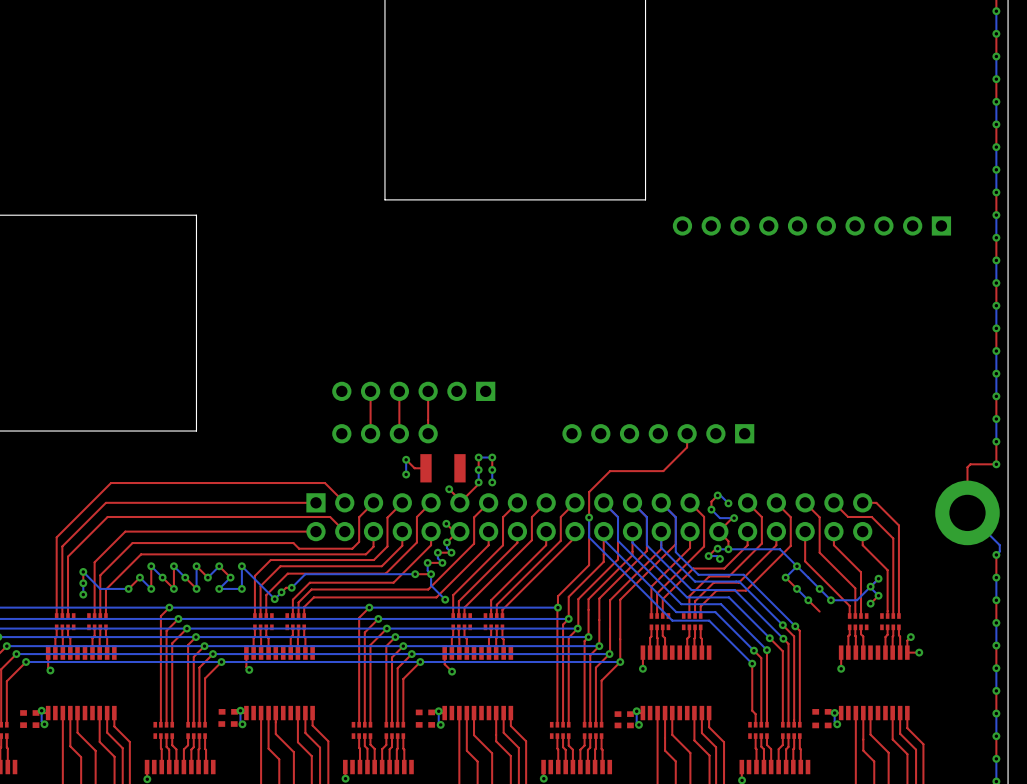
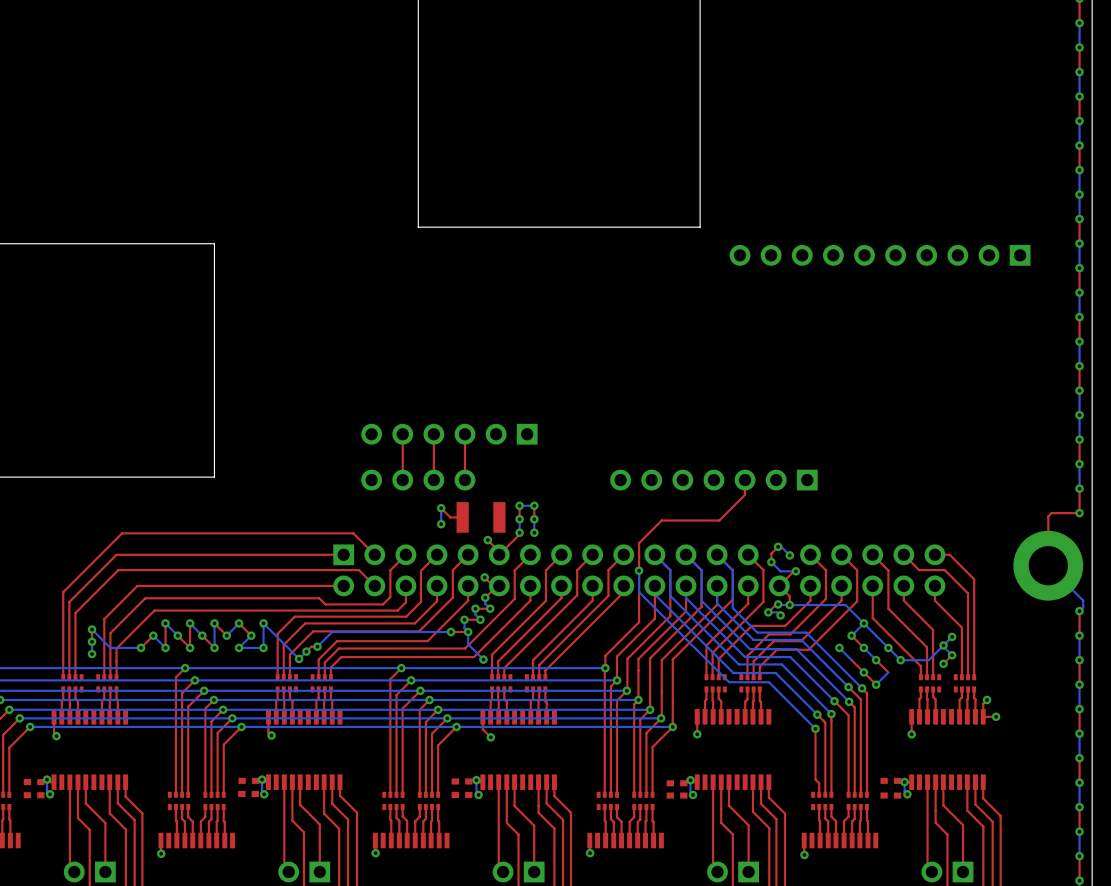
bottom track: none -> (839, 647) (851, 660)
via: none -> (839, 647)
top track: none -> (851, 660) (876, 684)
via: none -> (863, 672)
bottom track: none -> (888, 672) (876, 684)
via: none -> (876, 684)

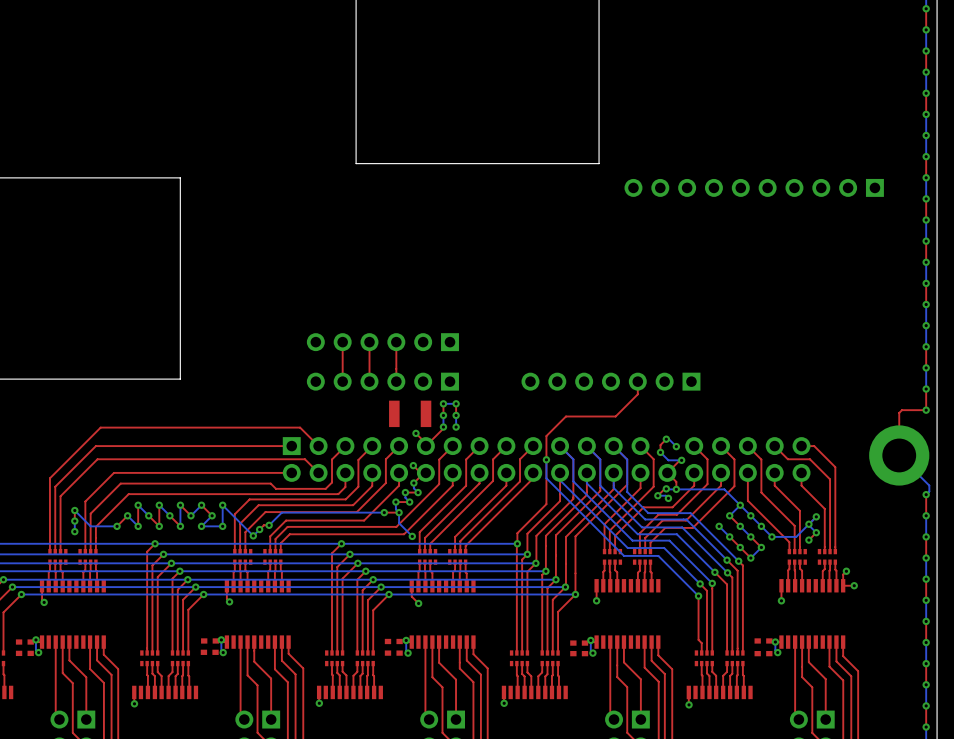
part: none -> (382, 381)
bottom track: (441, 508) (441, 524) -> none
top track: (441, 508) (450, 517) (462, 517) -> none
via: (441, 508) -> none
via: (441, 524) -> none
via: none -> (750, 515)
via: none -> (729, 536)
via: none -> (761, 547)

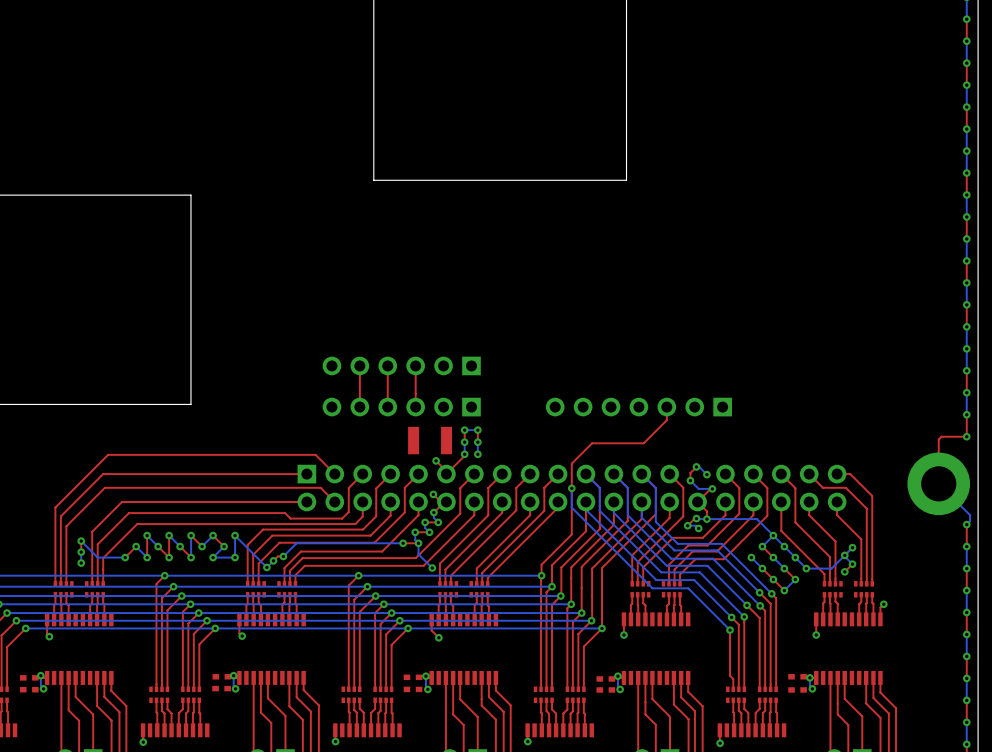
part: (754, 187) -> none
top track: (854, 585) (843, 585) -> none
via: (854, 585) -> none

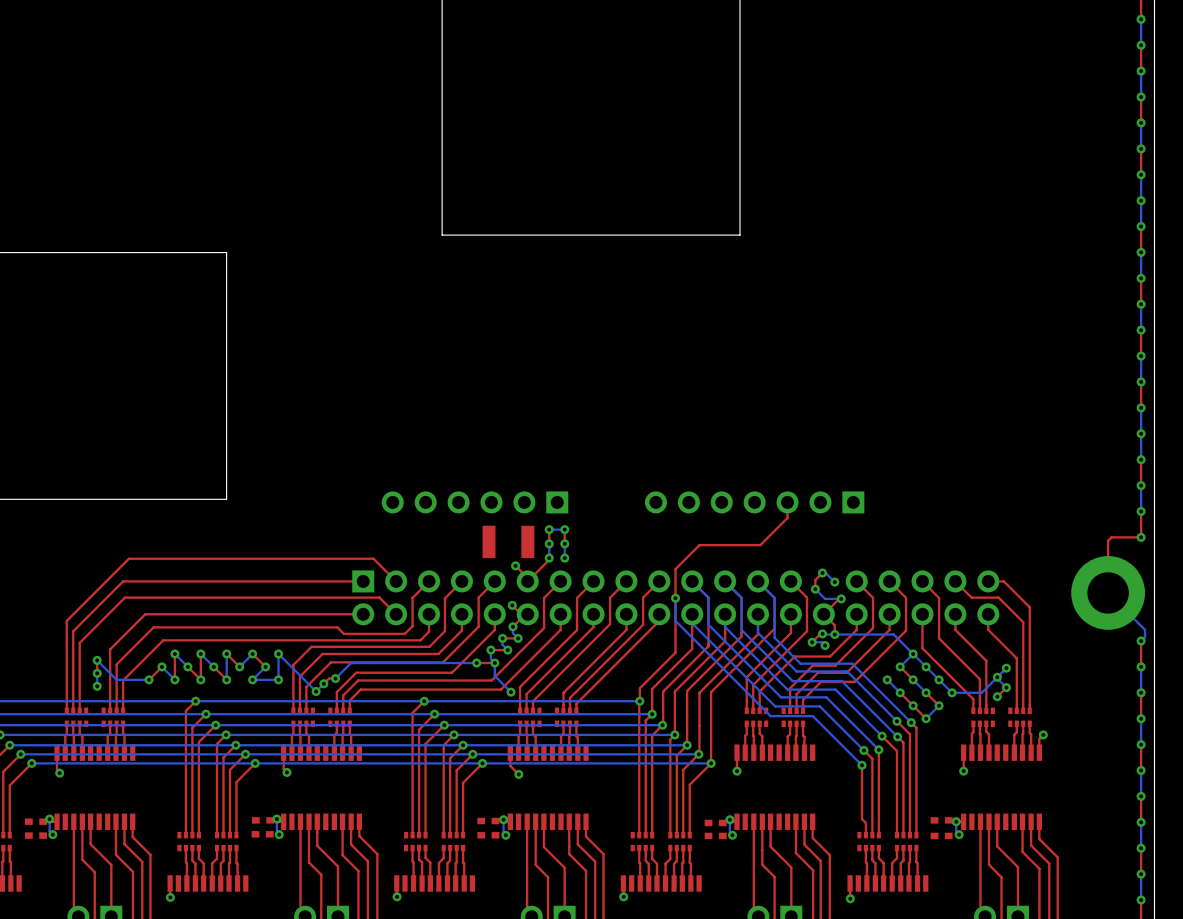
top track: (359, 365) (359, 407) -> none
top track: (387, 365) (387, 407) -> none
part: (401, 365) -> none
top track: (415, 365) (415, 407) -> none

